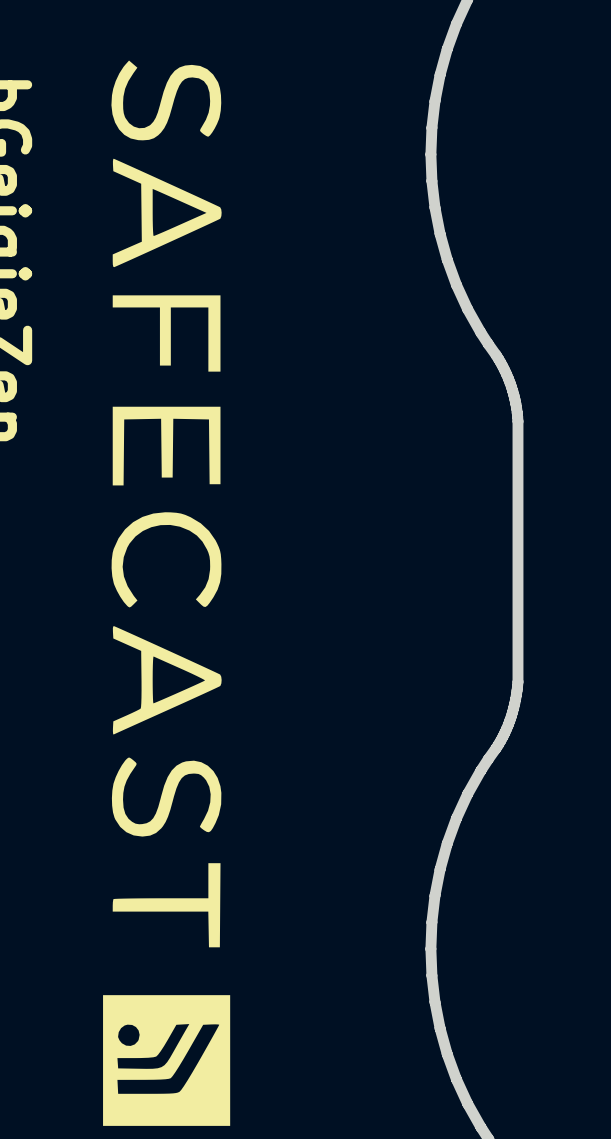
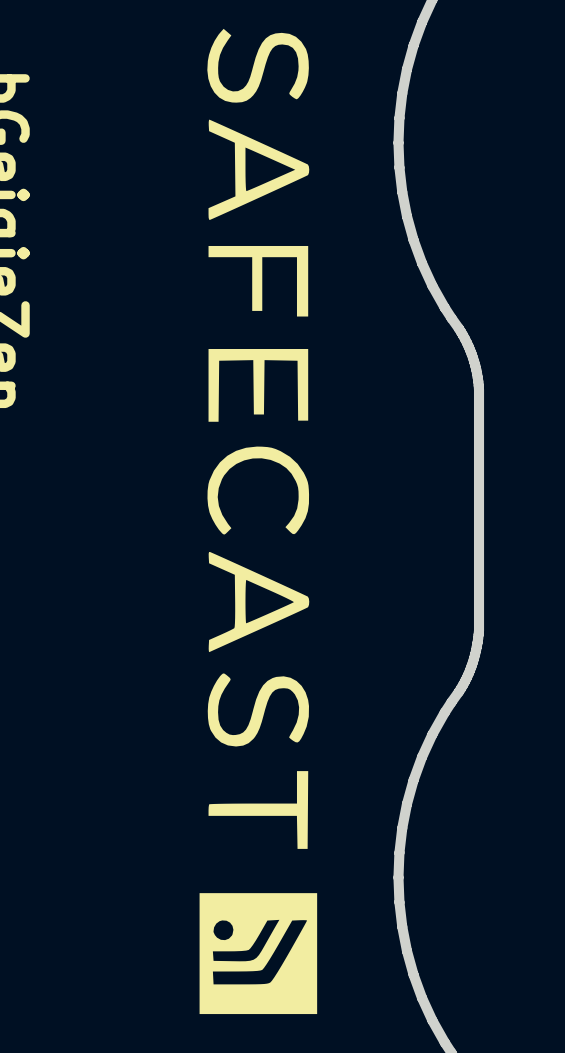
drawing: none -> [199, 28, 318, 1015]
drawing: [103, 60, 231, 1126] -> none

